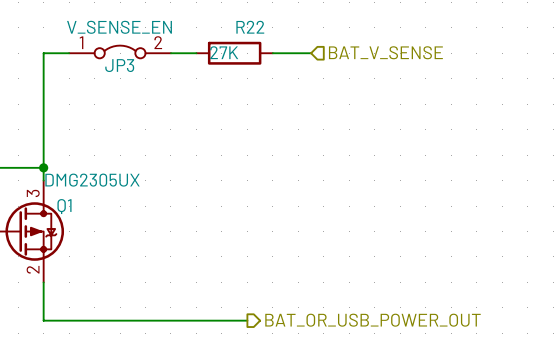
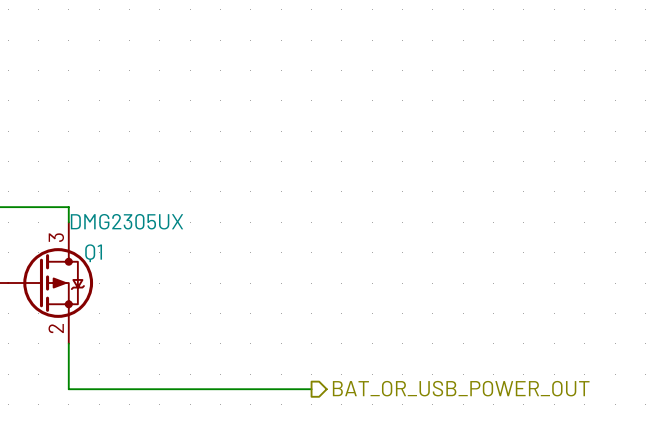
JP3: V_SENSE_EN (120, 51) -> none
hierarchical label: BAT_V_SENSE (385, 52) -> none
wire: (69, 53) (43, 53) (43, 167) -> none
wire: (170, 53) (196, 53) -> none
R22: 27K (234, 53) -> none
wire: (272, 53) (311, 53) -> none
junction: (43, 167) -> none

